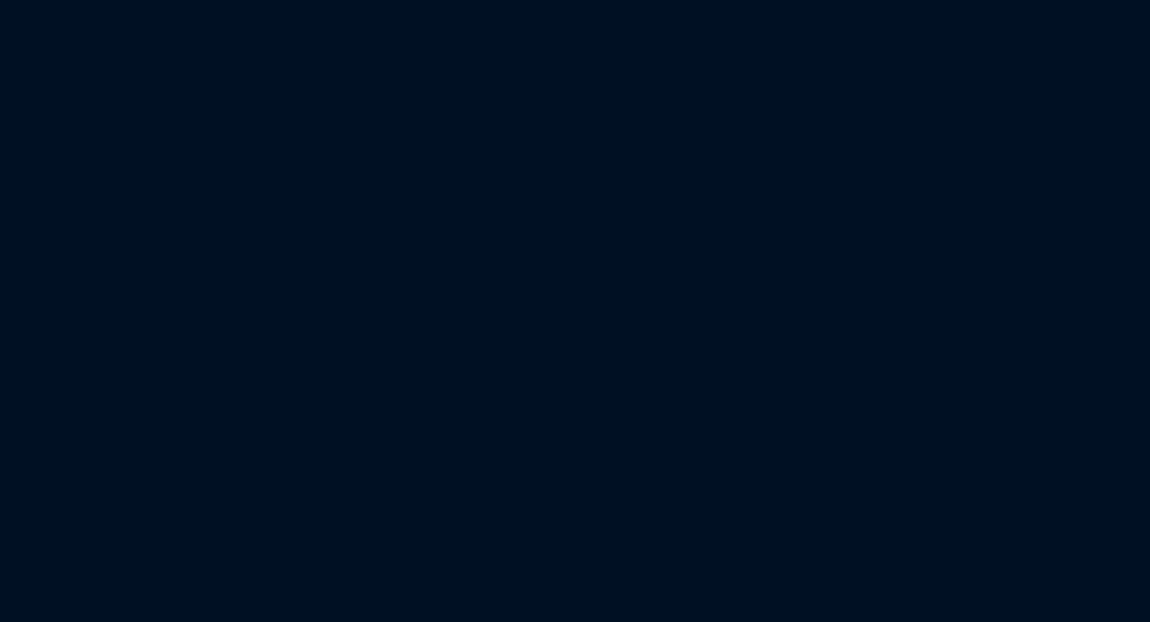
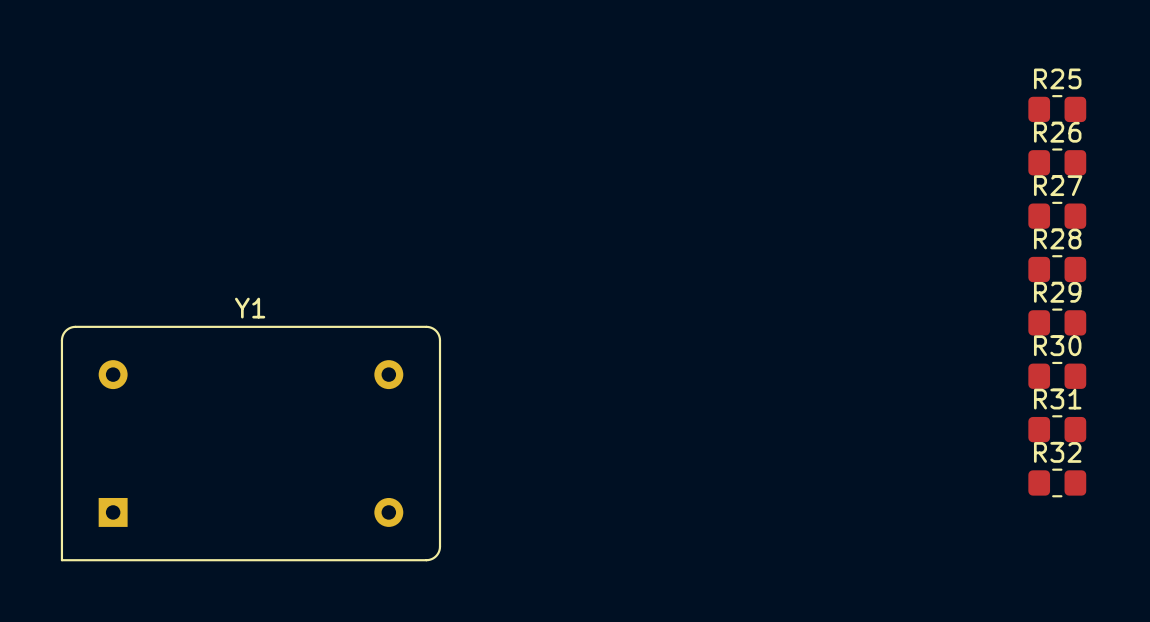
R25: none -> (1057, 109)
R26: none -> (1057, 162)
R27: none -> (1057, 216)
R28: none -> (1057, 269)
R29: none -> (1057, 322)
R30: none -> (1057, 376)
R31: none -> (1057, 429)
Y1: none -> (250, 443)
R32: none -> (1057, 482)

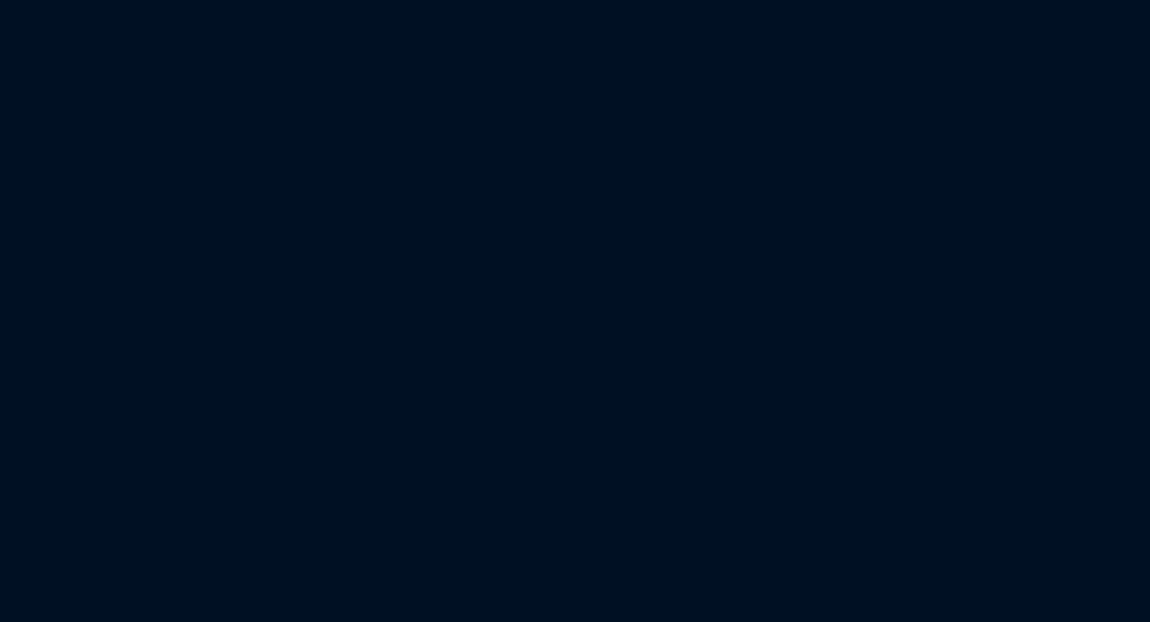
R25: (1057, 109) -> none
R26: (1057, 162) -> none
R27: (1057, 216) -> none
R28: (1057, 269) -> none
R29: (1057, 322) -> none
R30: (1057, 376) -> none
R31: (1057, 429) -> none
Y1: (250, 443) -> none
R32: (1057, 482) -> none

